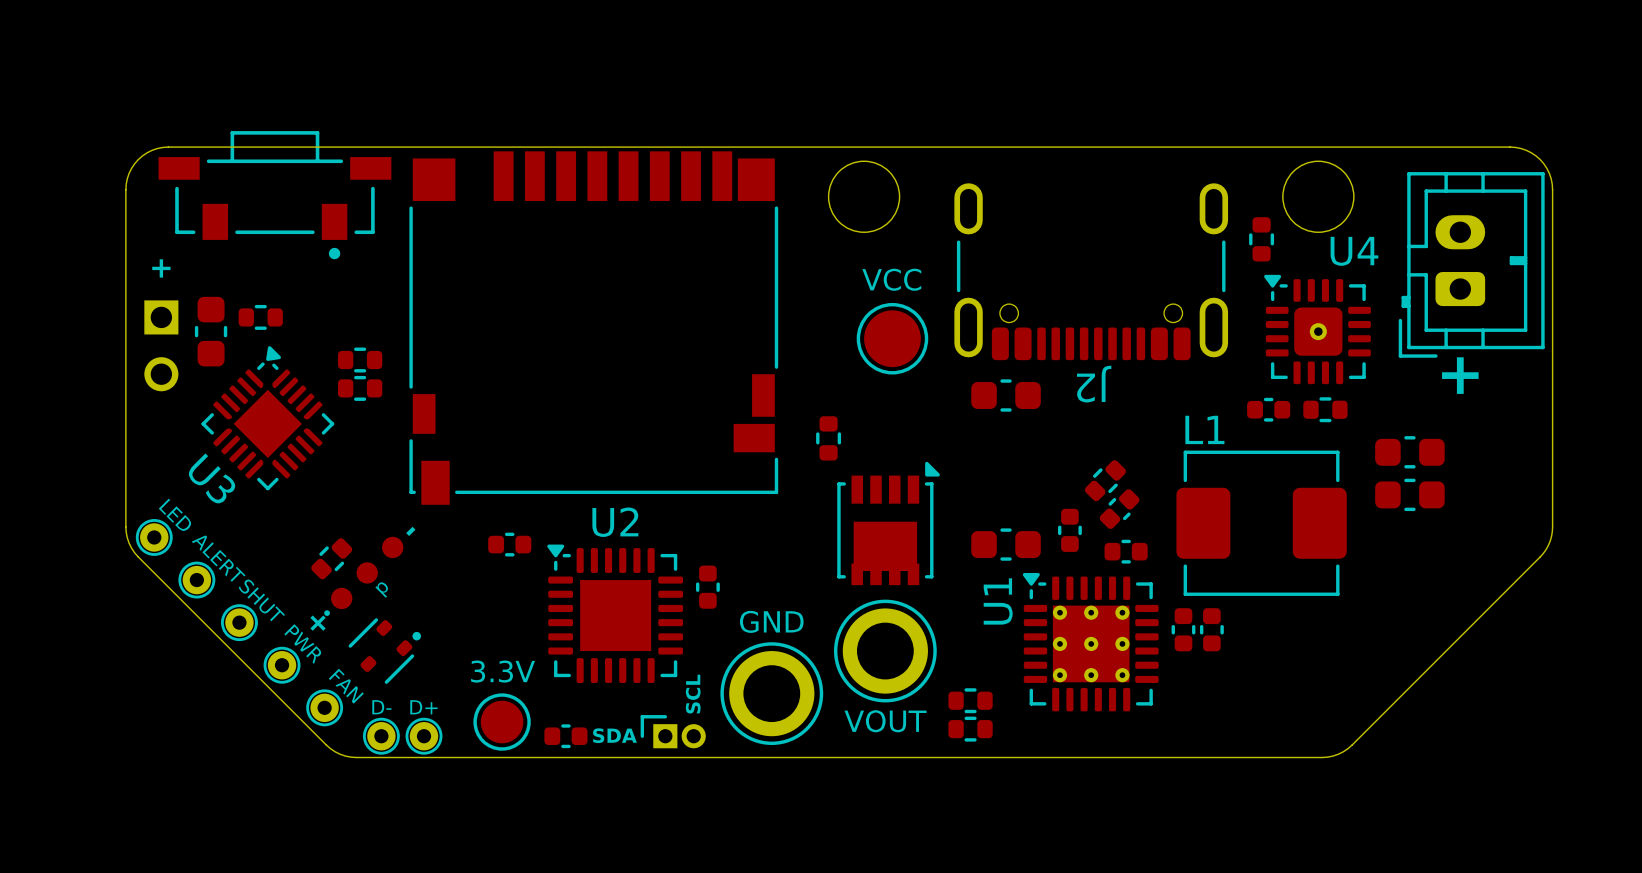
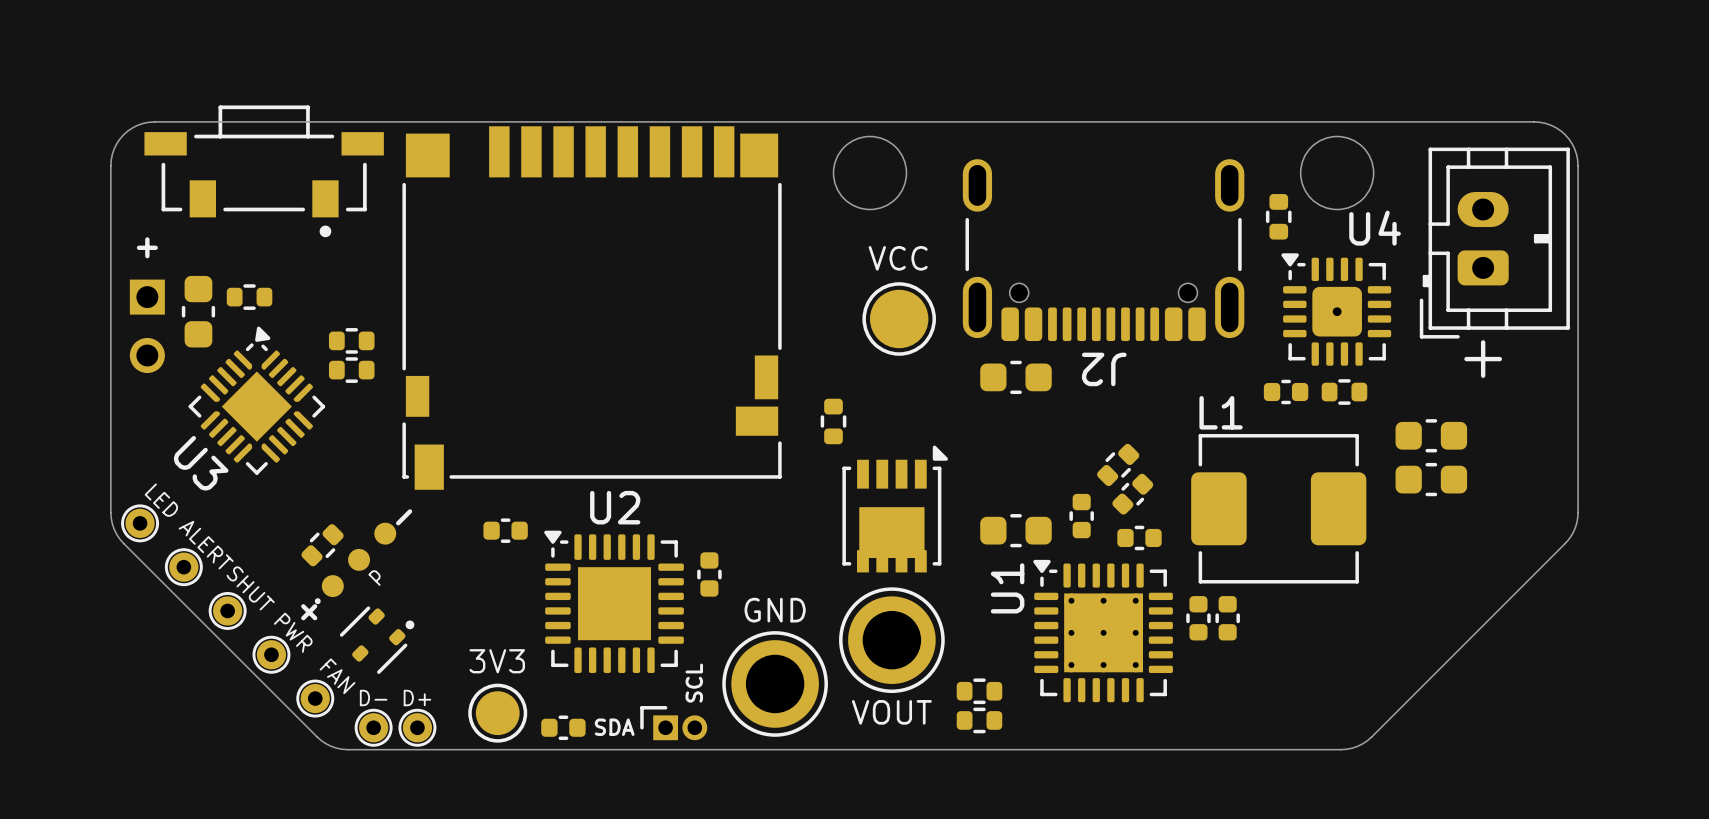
part value: 3.3V (503, 671) -> 3V3 (497, 661)

